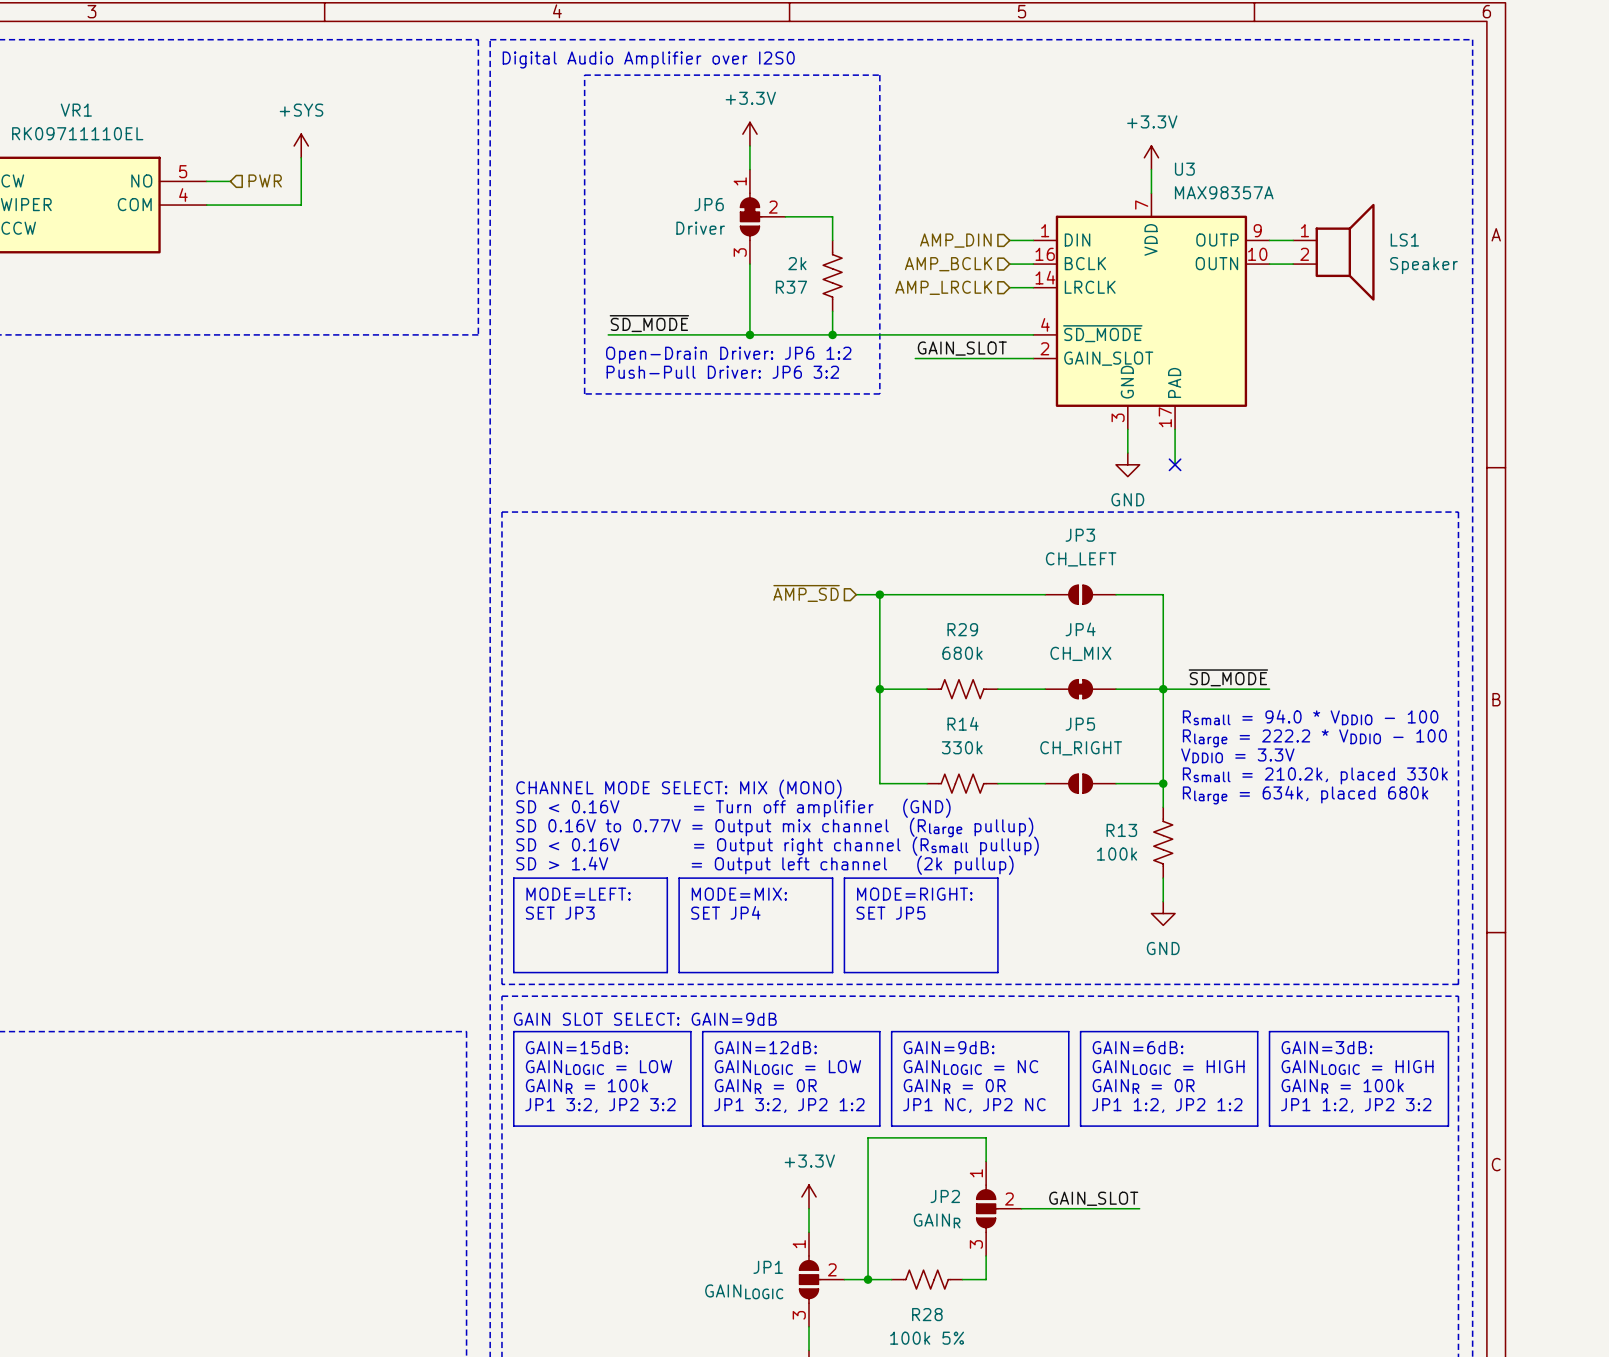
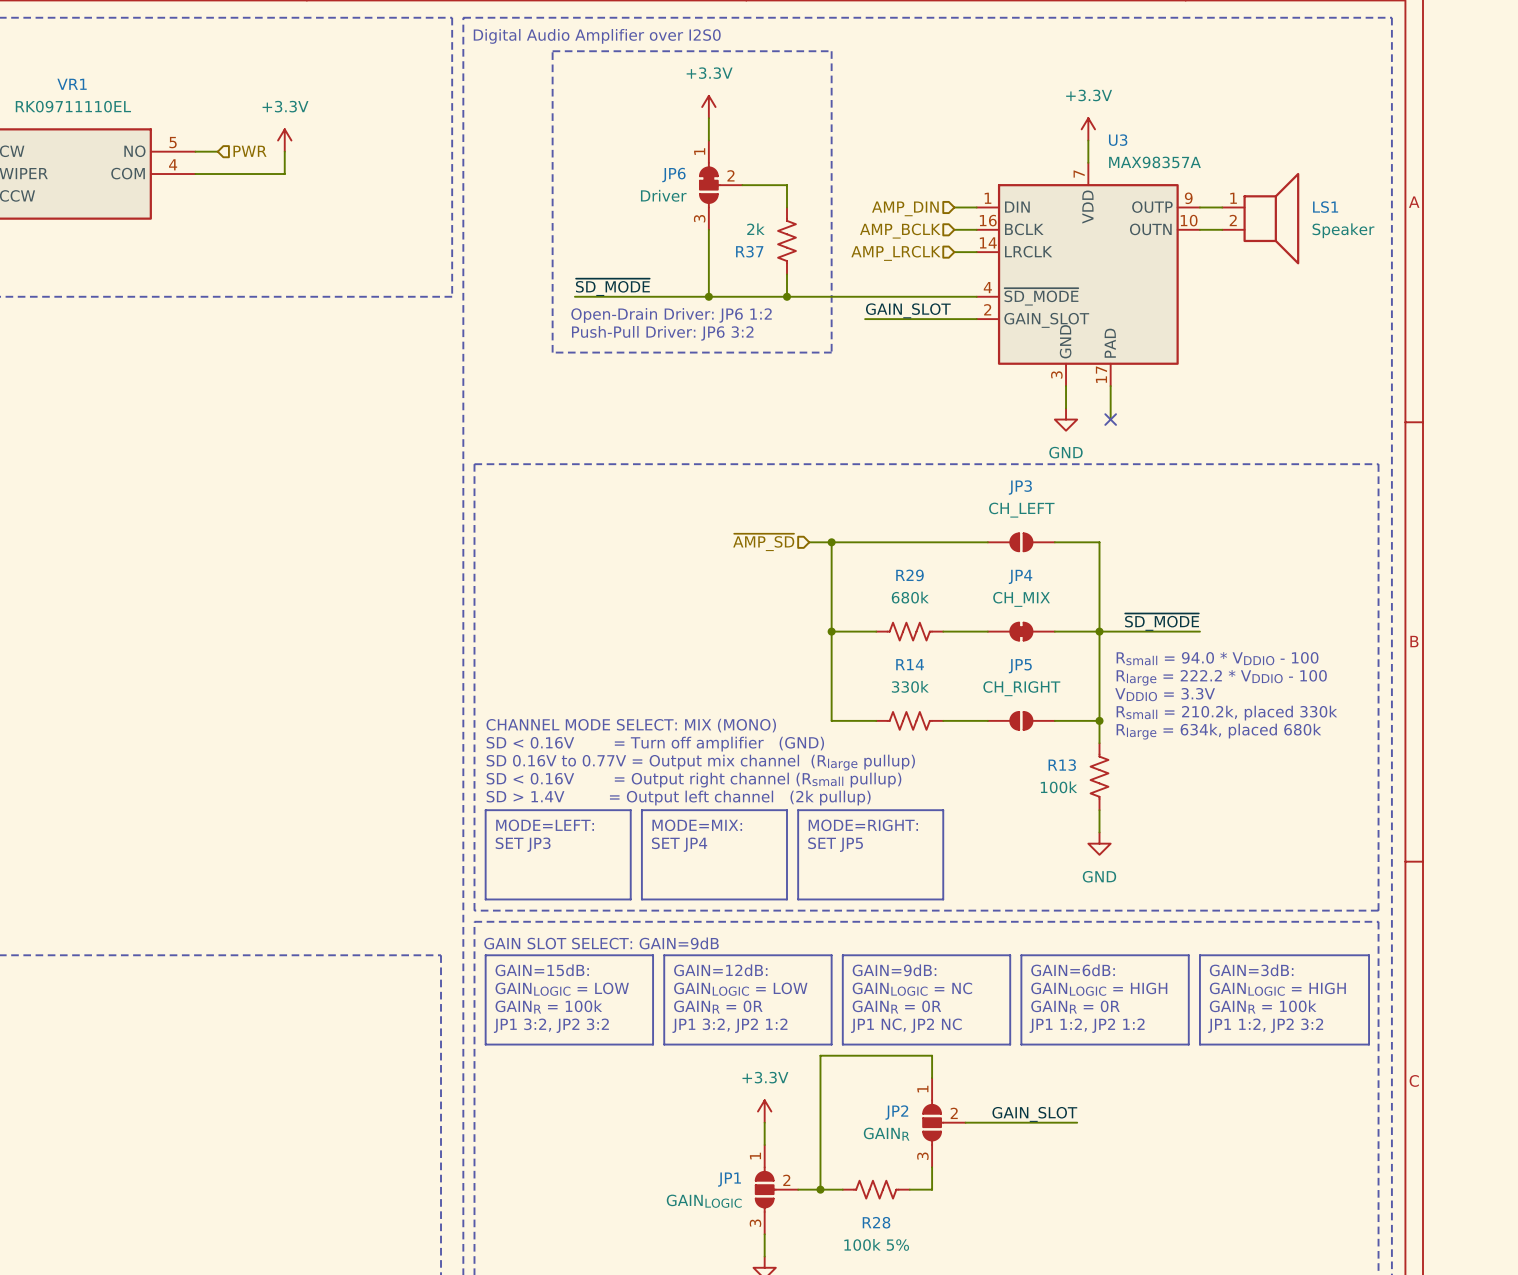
power symbol: +SYS (301, 145) -> none
power symbol: none -> +3.3V (284, 140)

